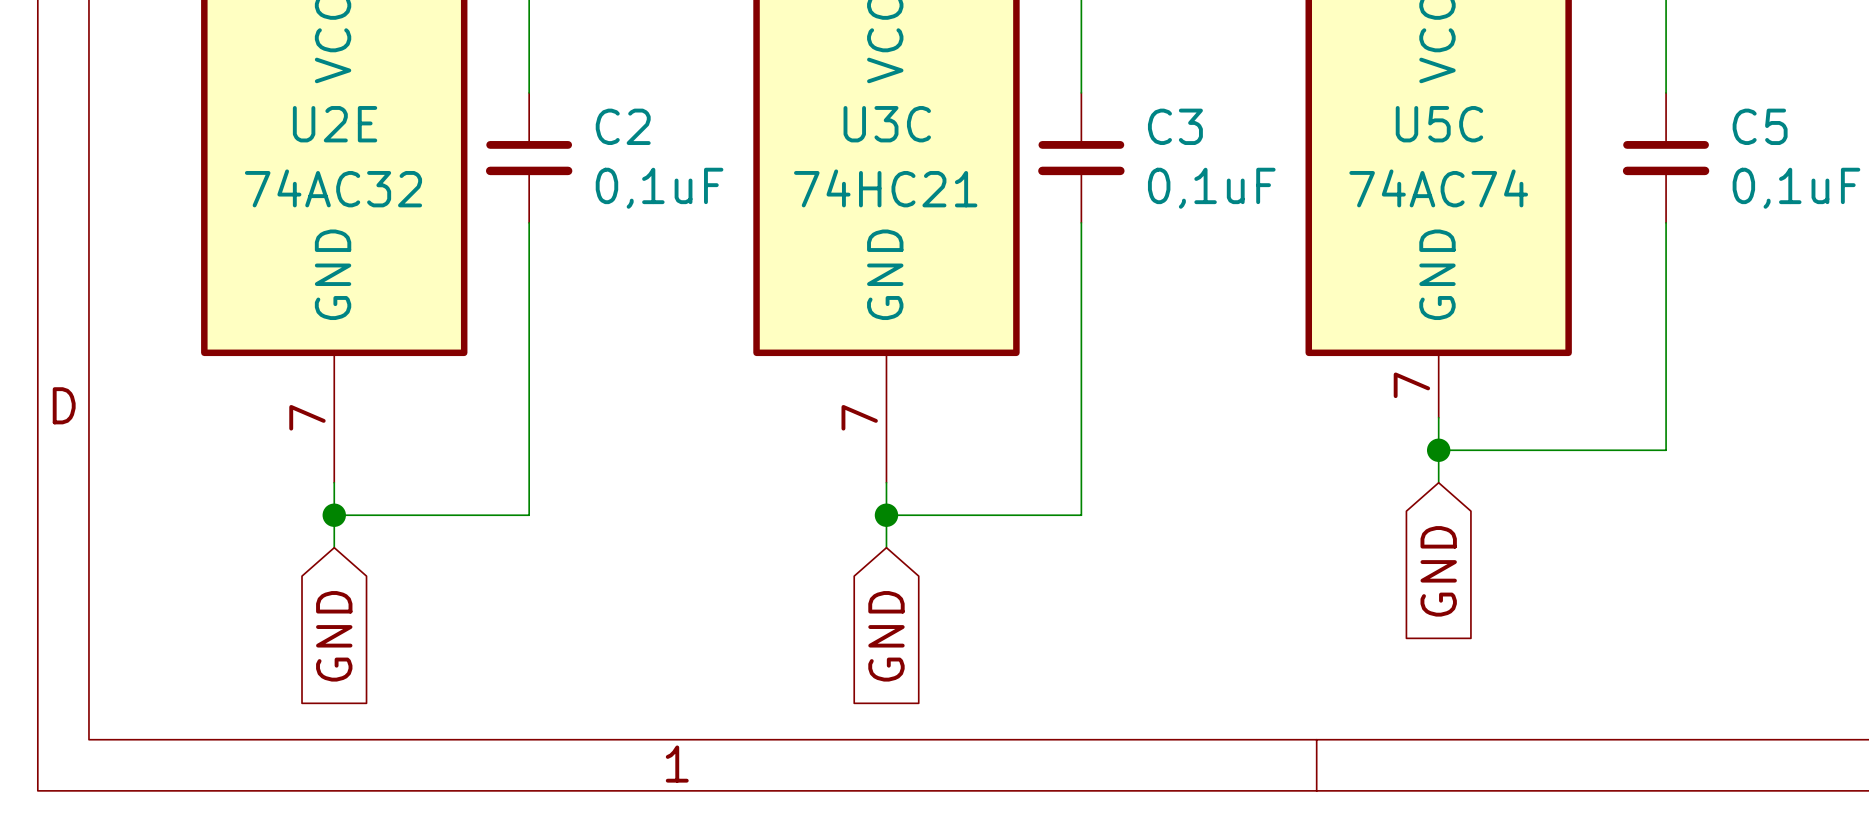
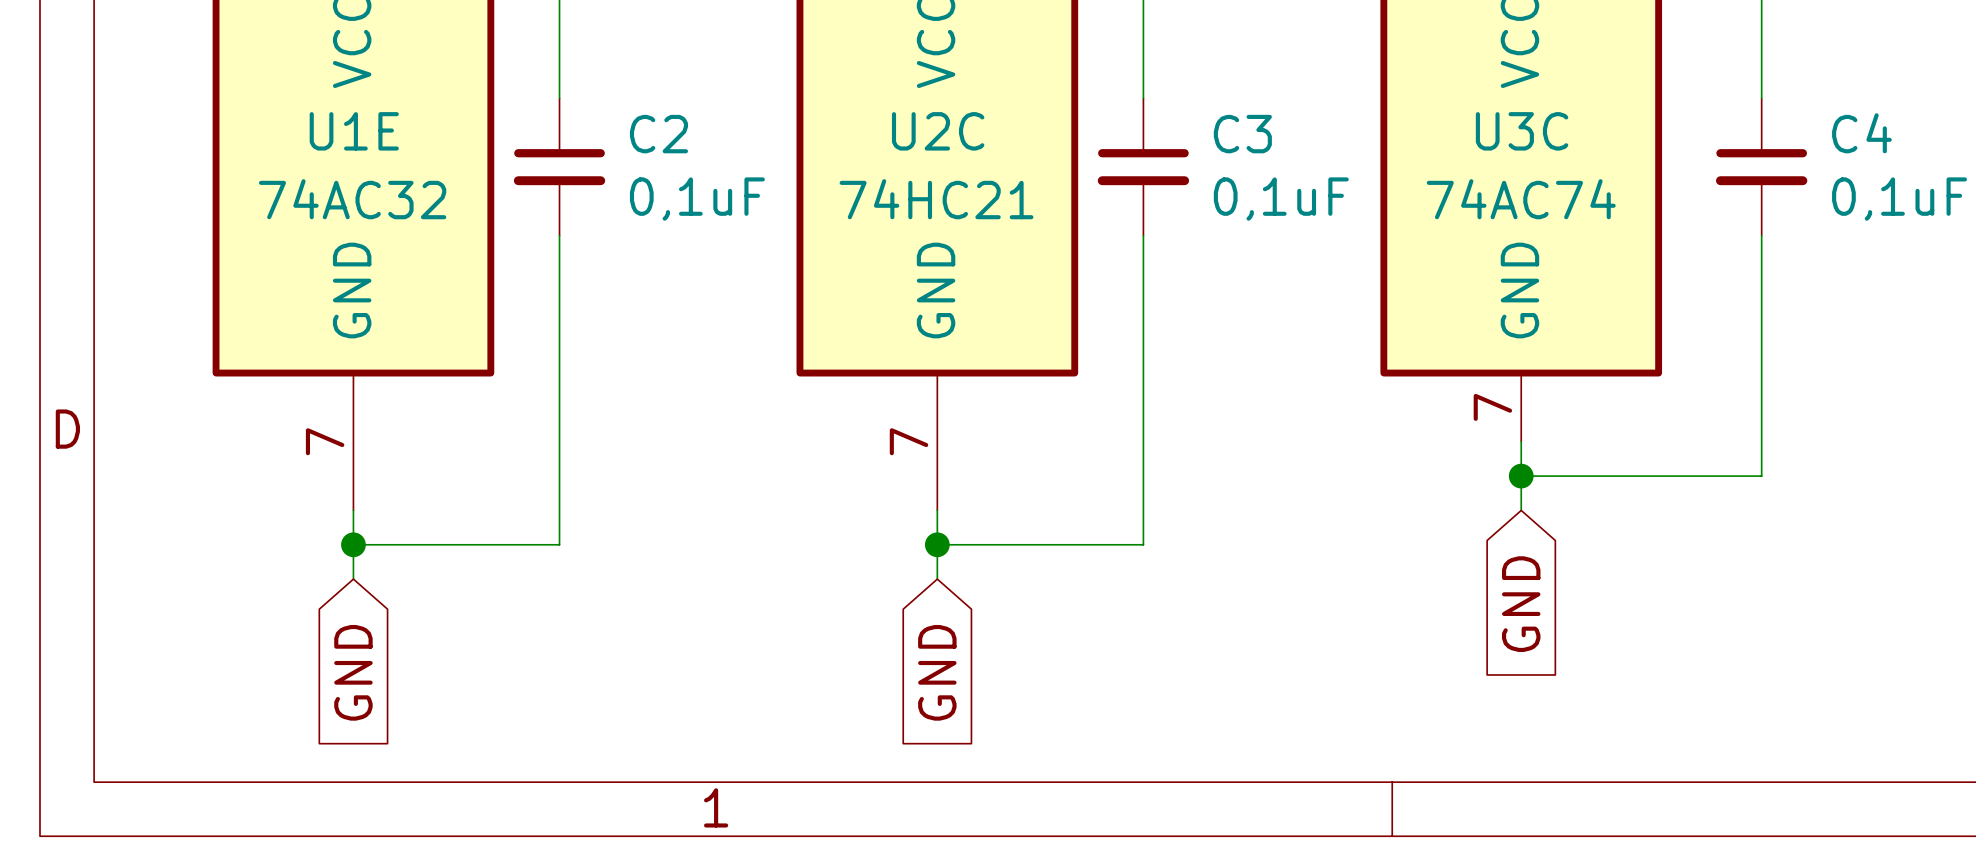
U2E name: U2E (335, 124) -> U1E (354, 131)
U3C name: U3C (887, 124) -> U2C (938, 131)
U5C name: U5C (1439, 124) -> U3C (1522, 131)
C5 name: C5 (1760, 126) -> C4 (1861, 133)

